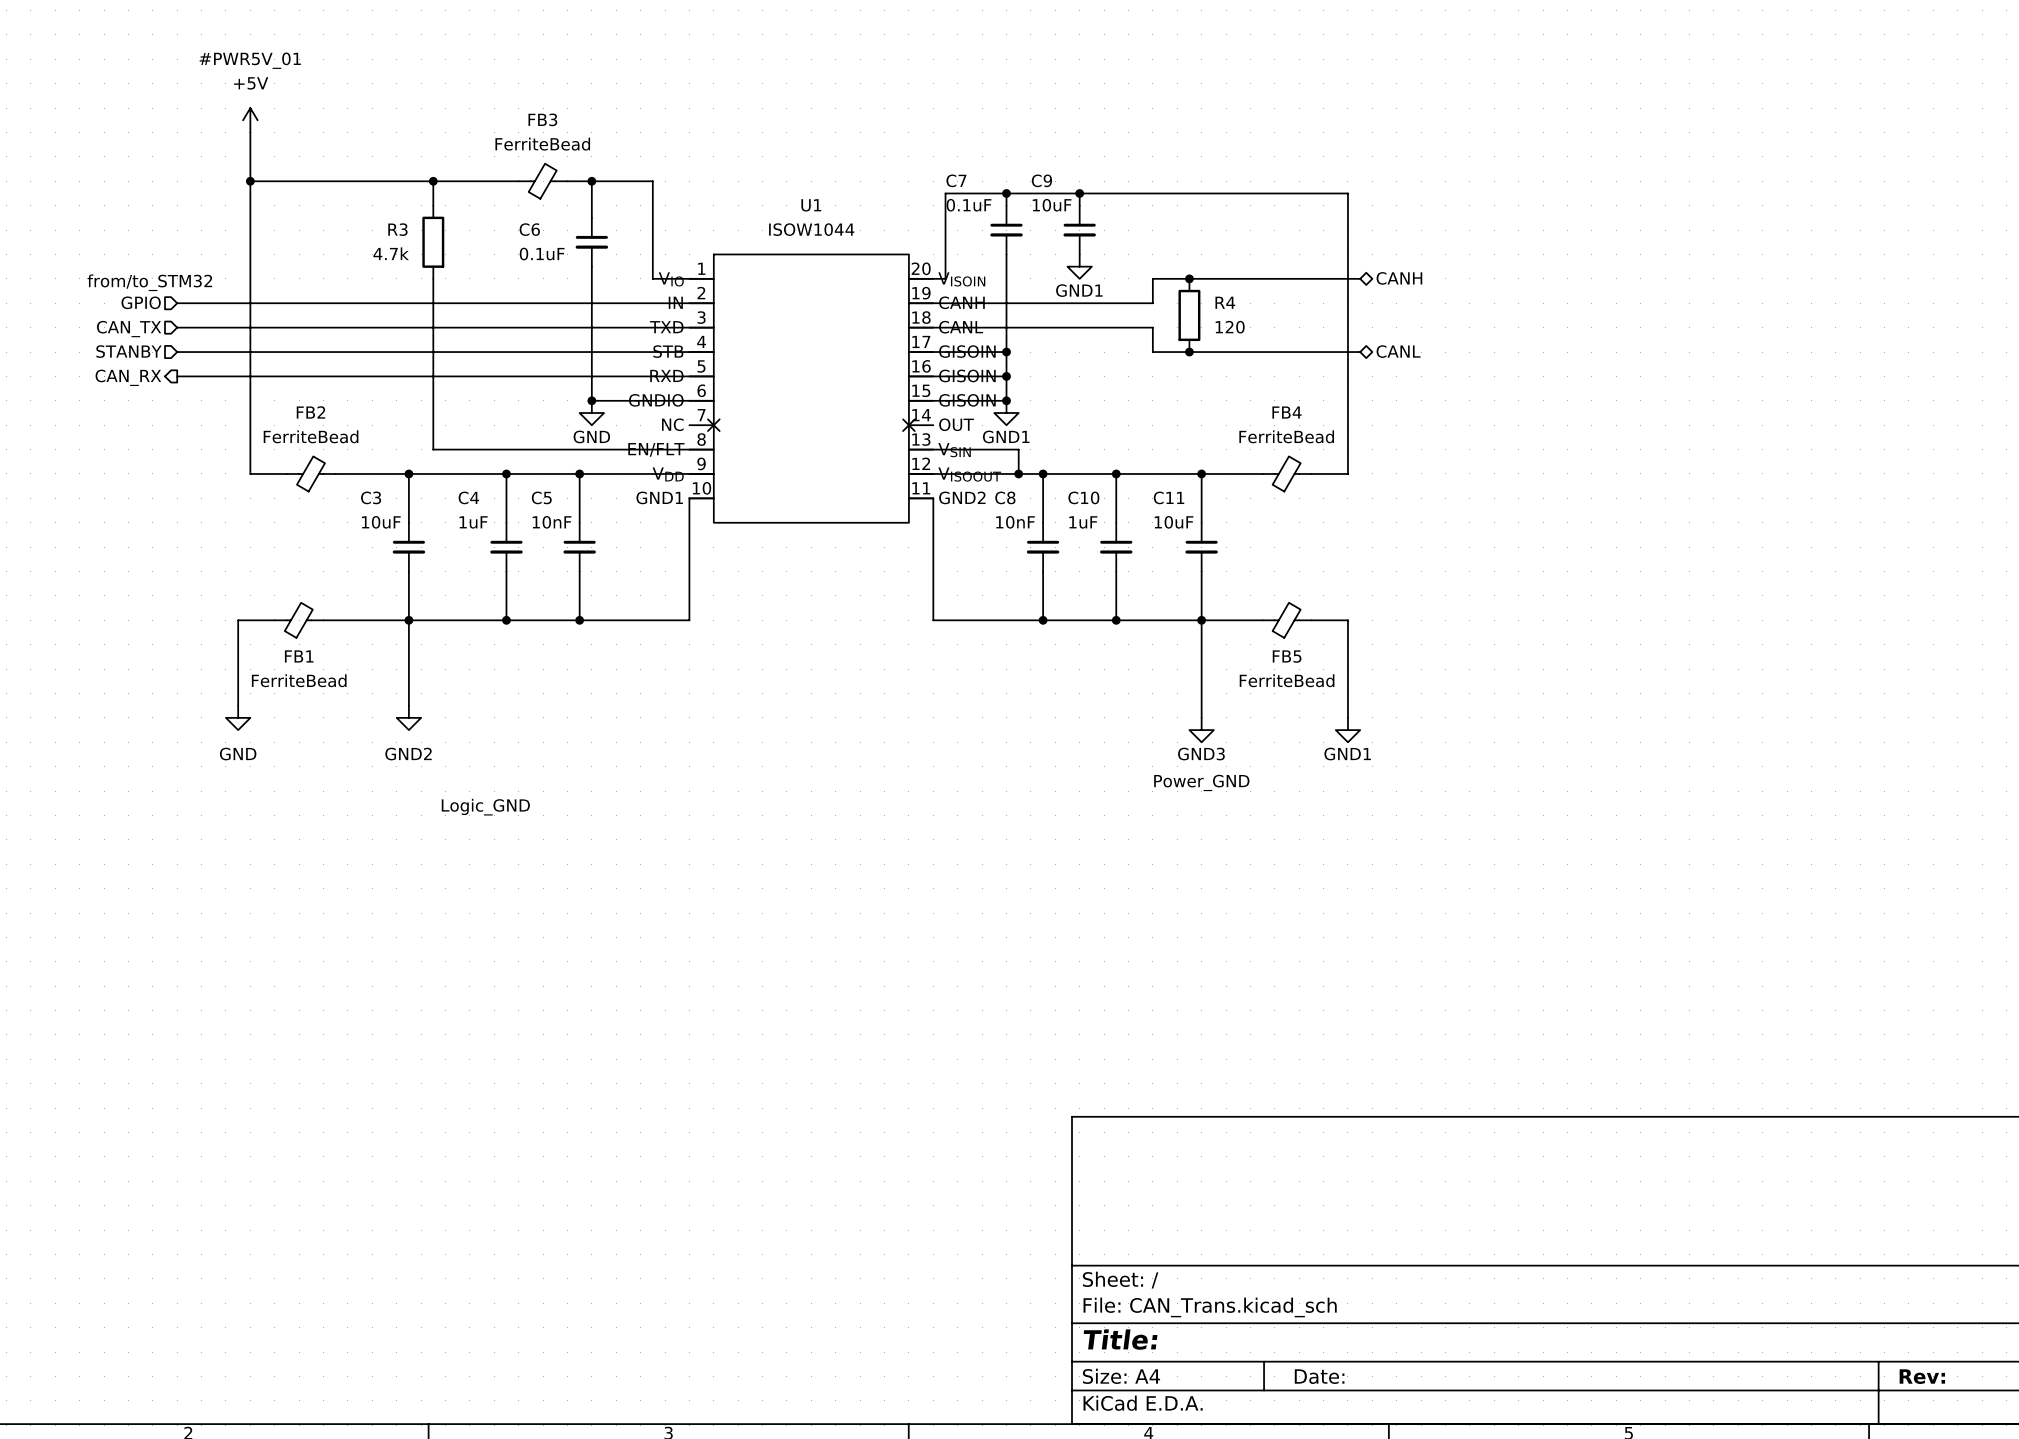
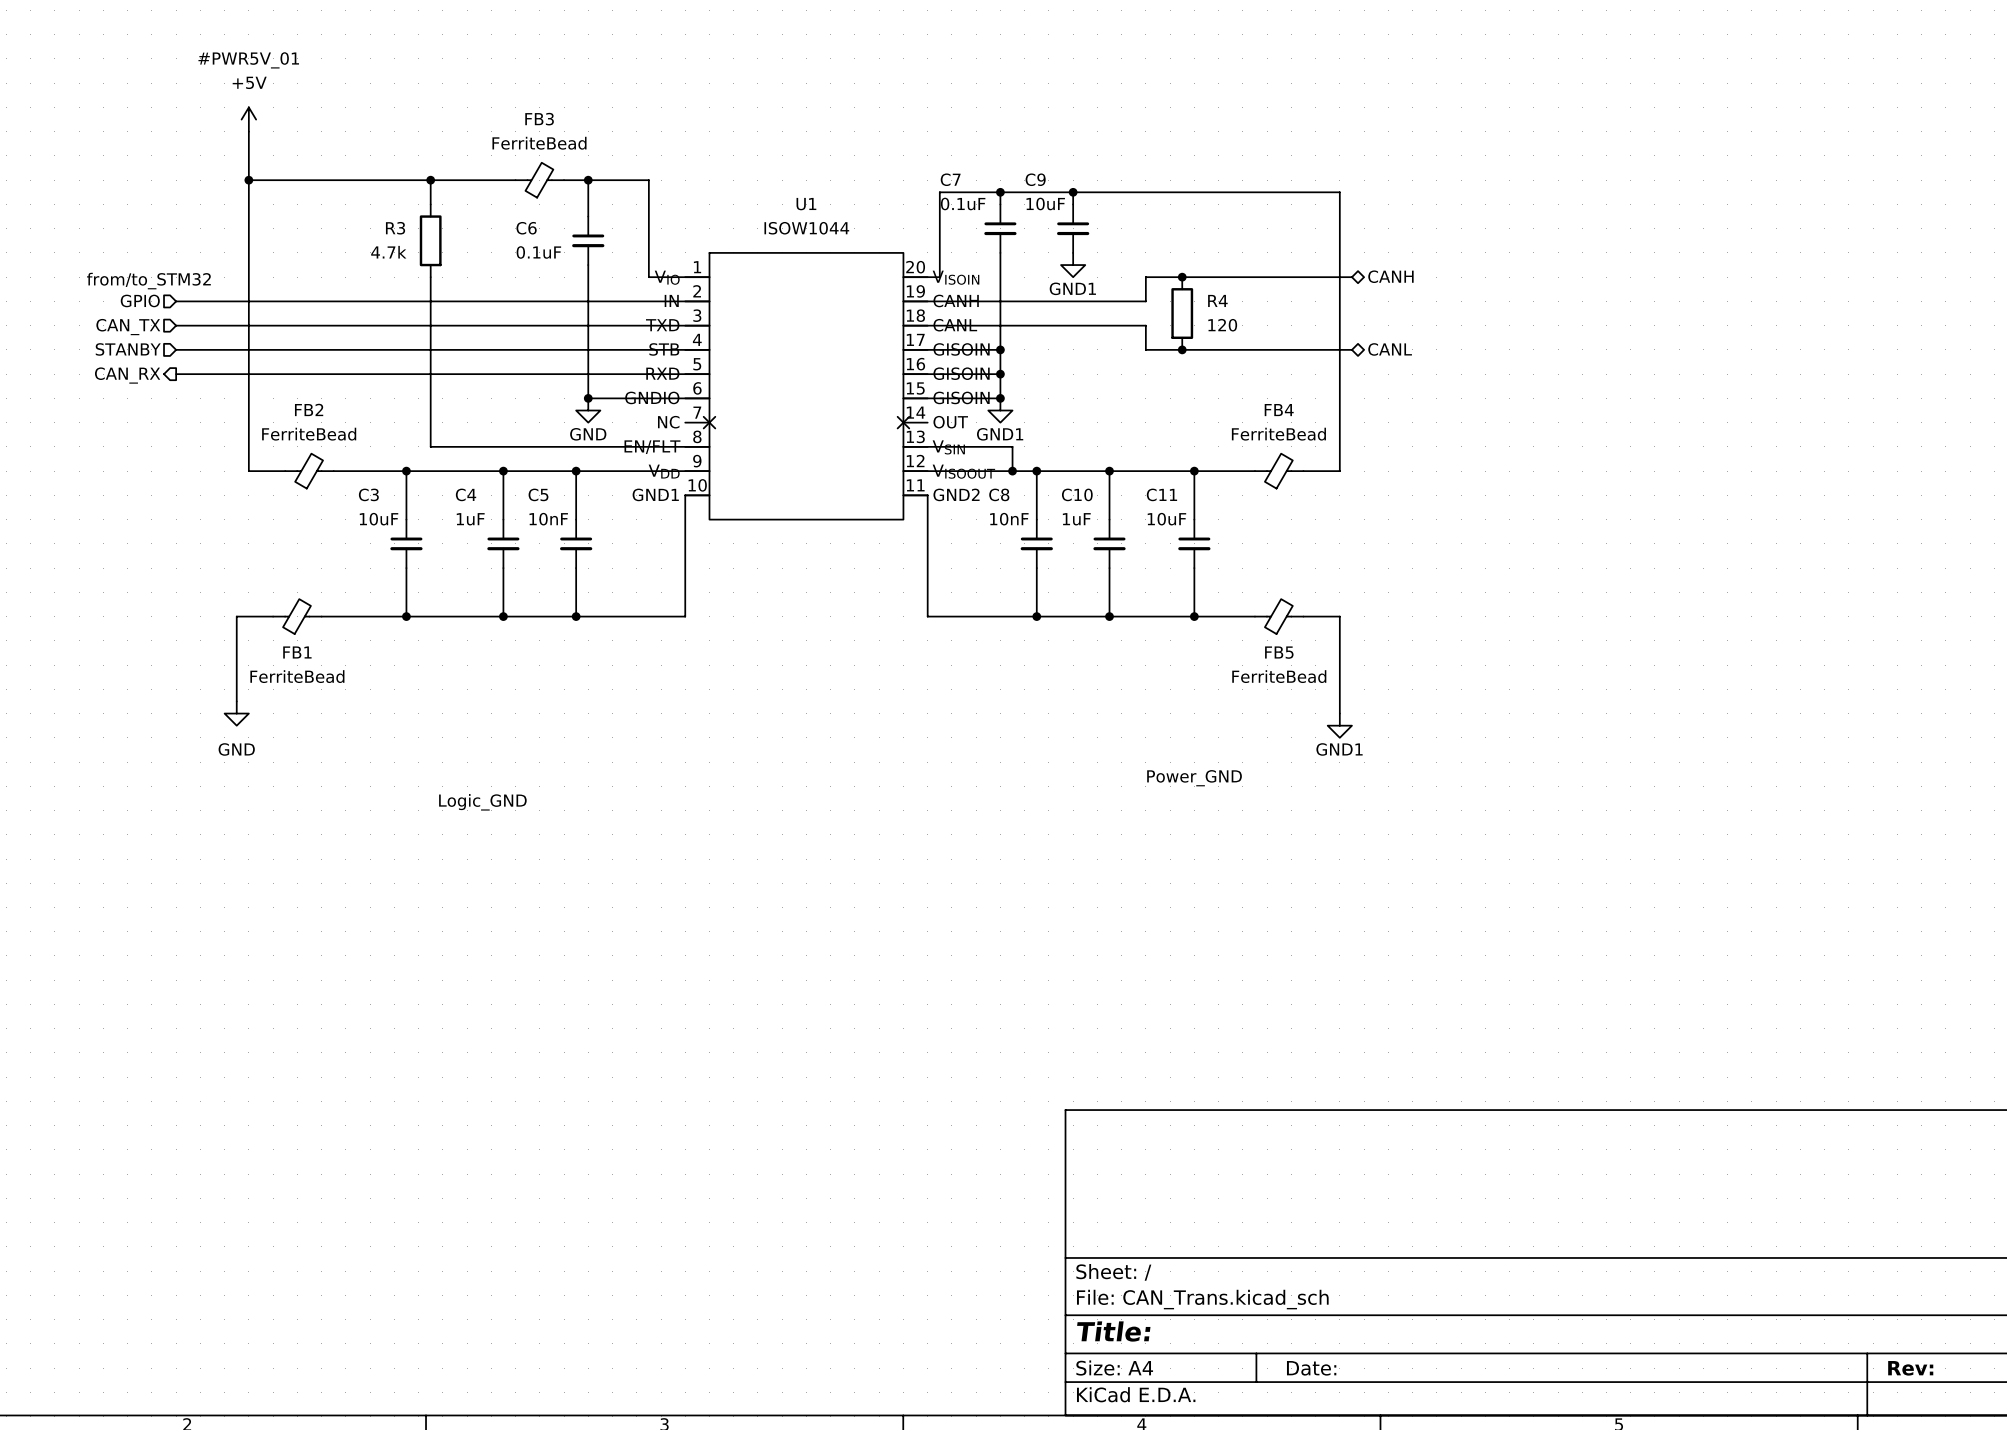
wire: (408, 620) (408, 705) -> none
wire: (1201, 620) (1201, 717) -> none
power symbol: GND2 (408, 717) -> none
power symbol: GND3 (1201, 730) -> none

